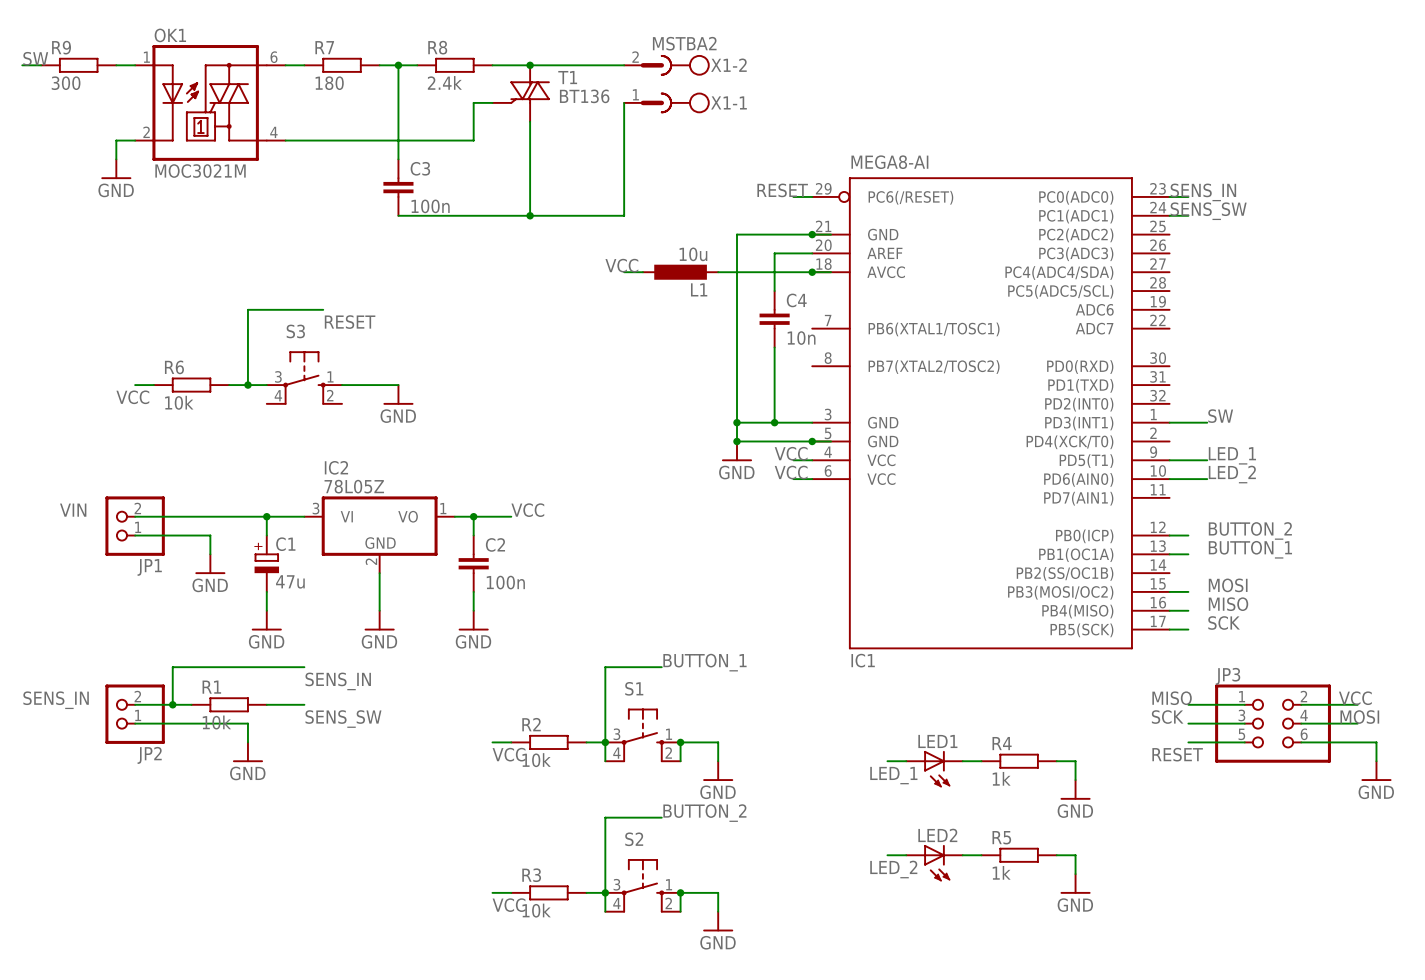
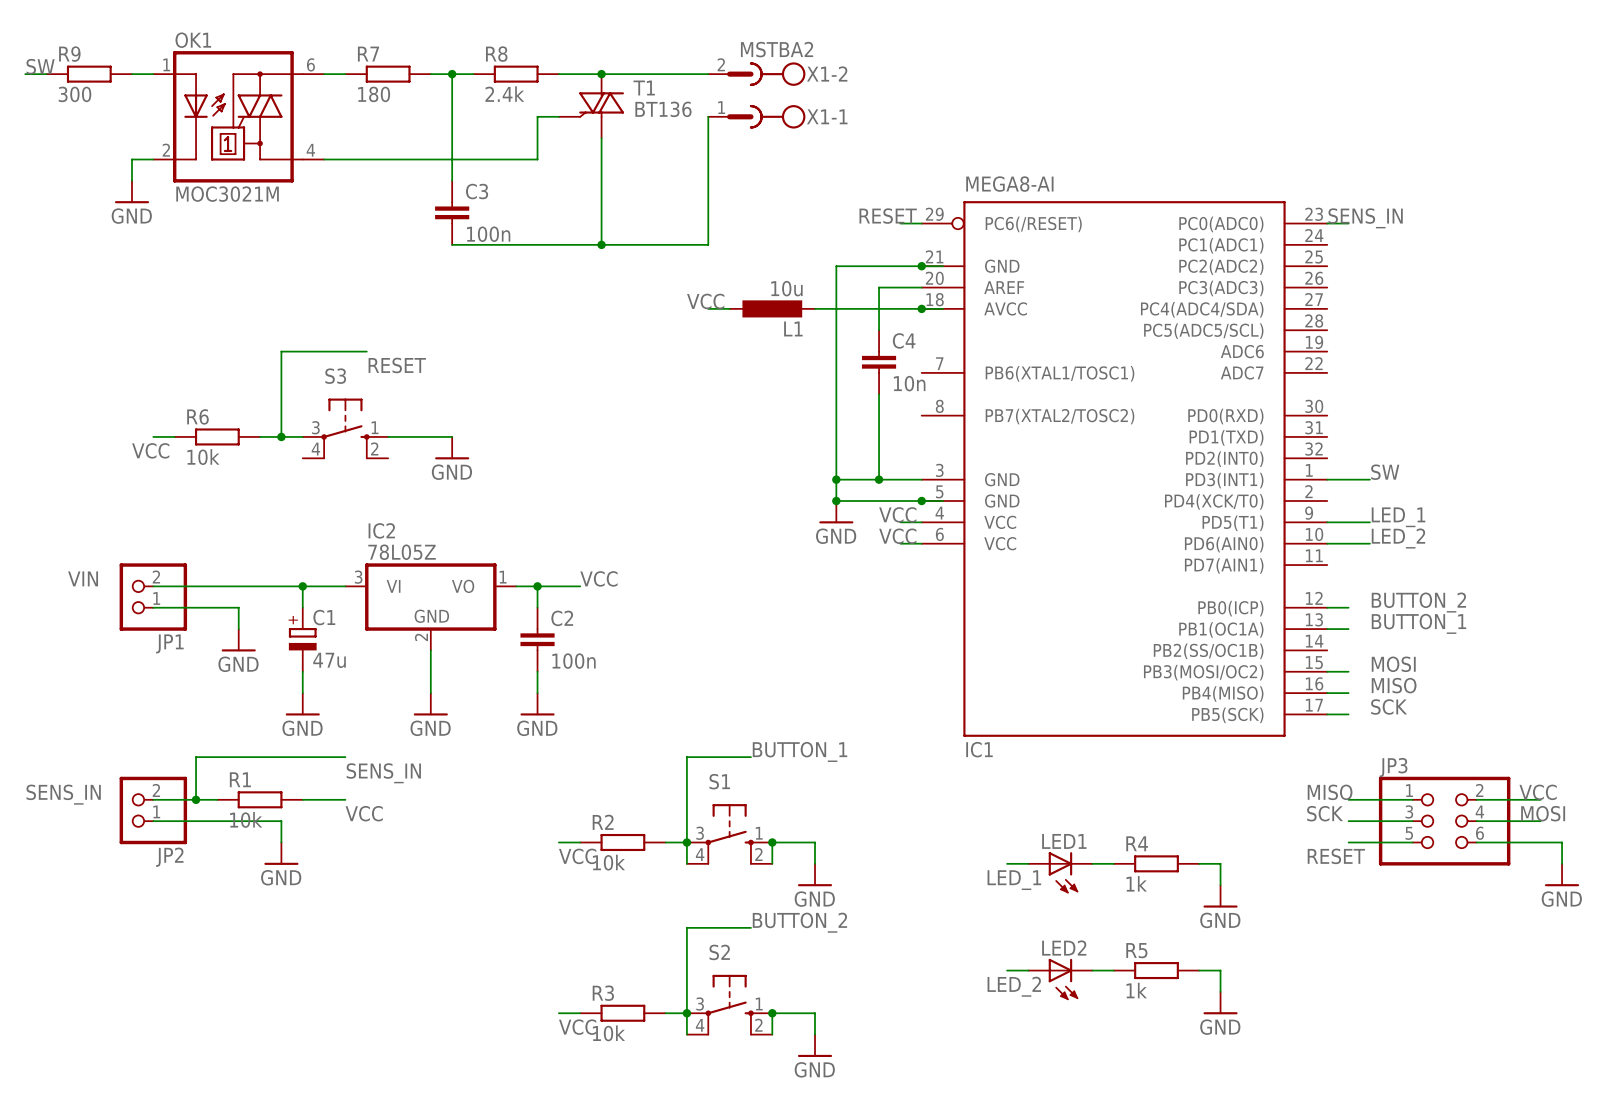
label: SENS_SW (1208, 211) -> none
wire: (1169, 215) (1188, 215) -> none
label: SENS_SW (343, 719) -> VCC (364, 813)

